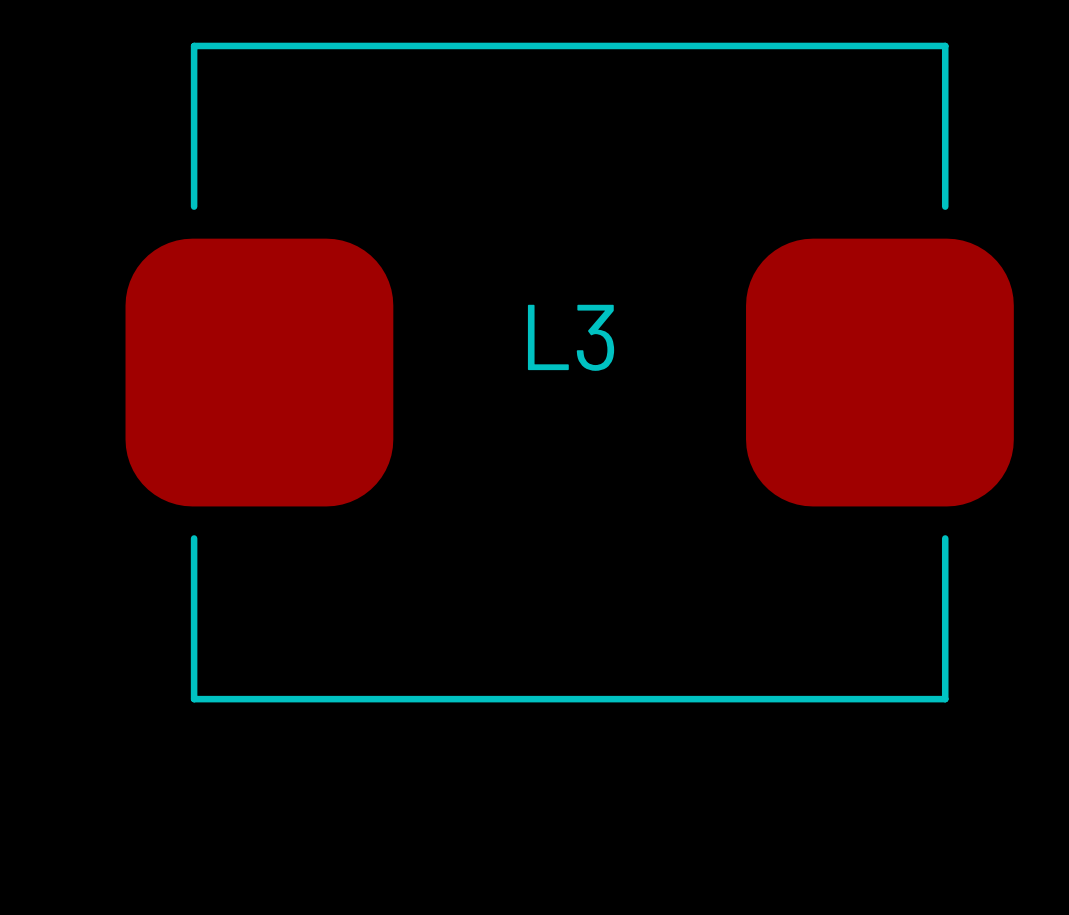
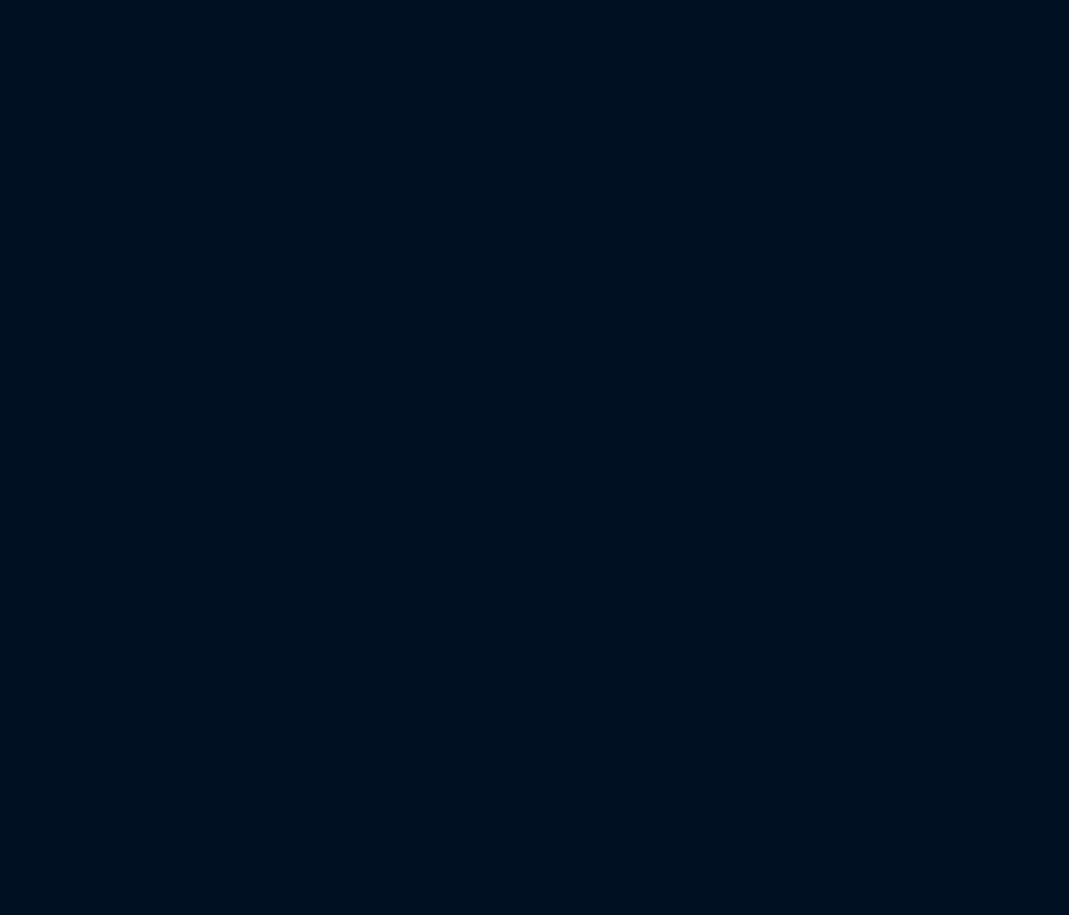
L3: (569, 372) -> none

